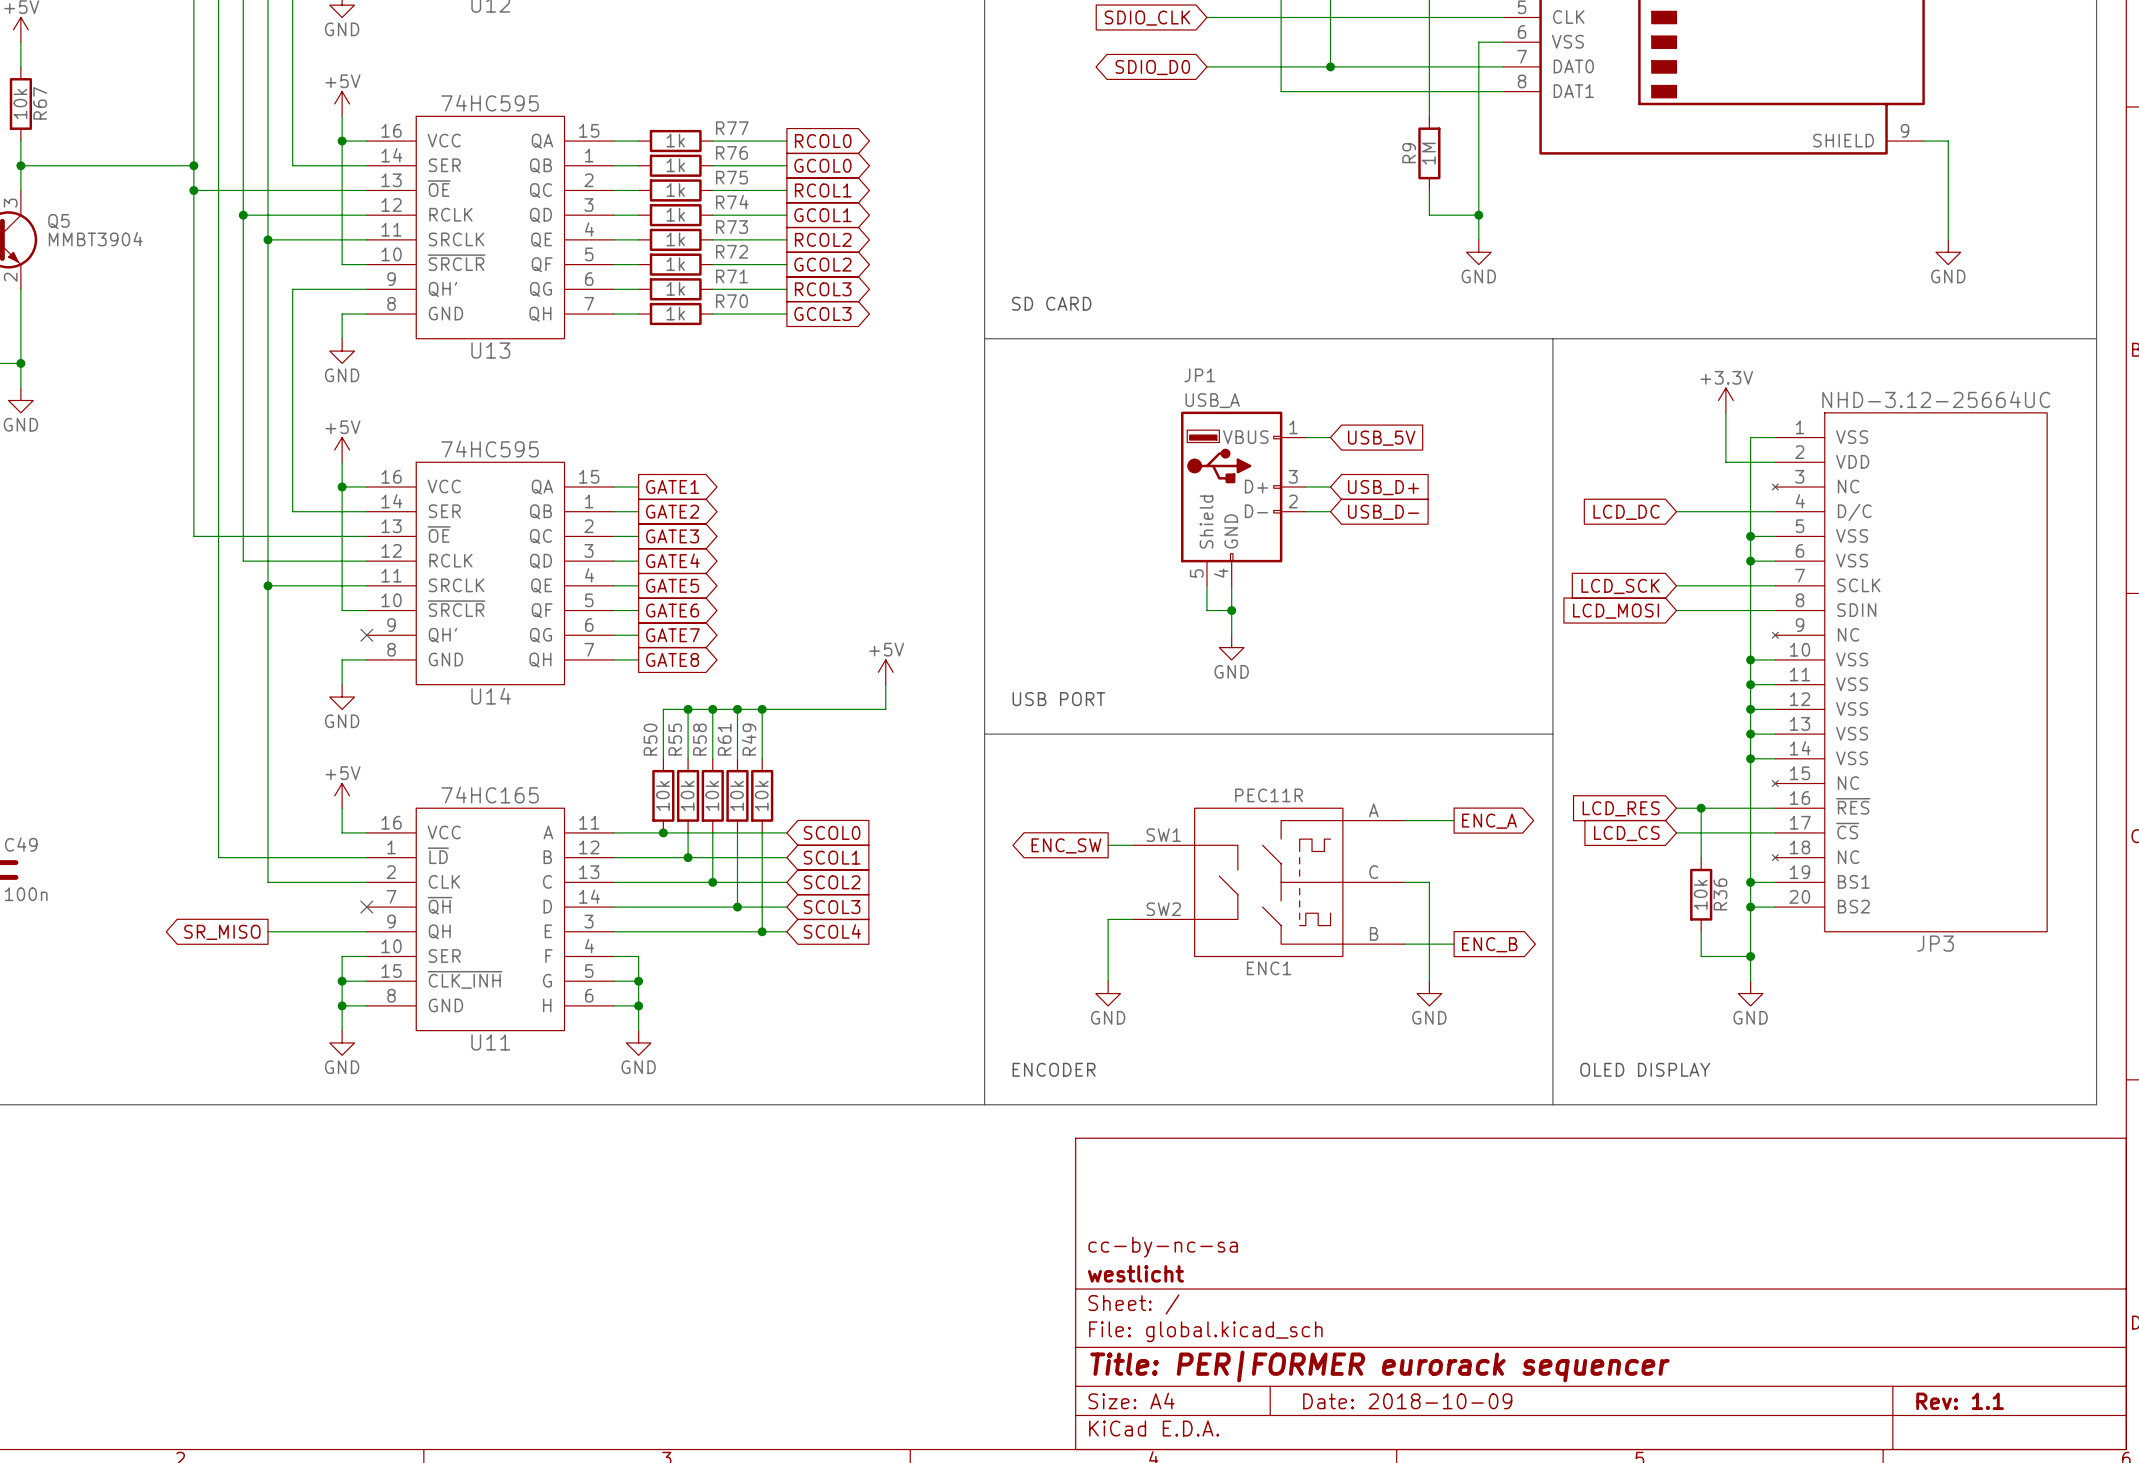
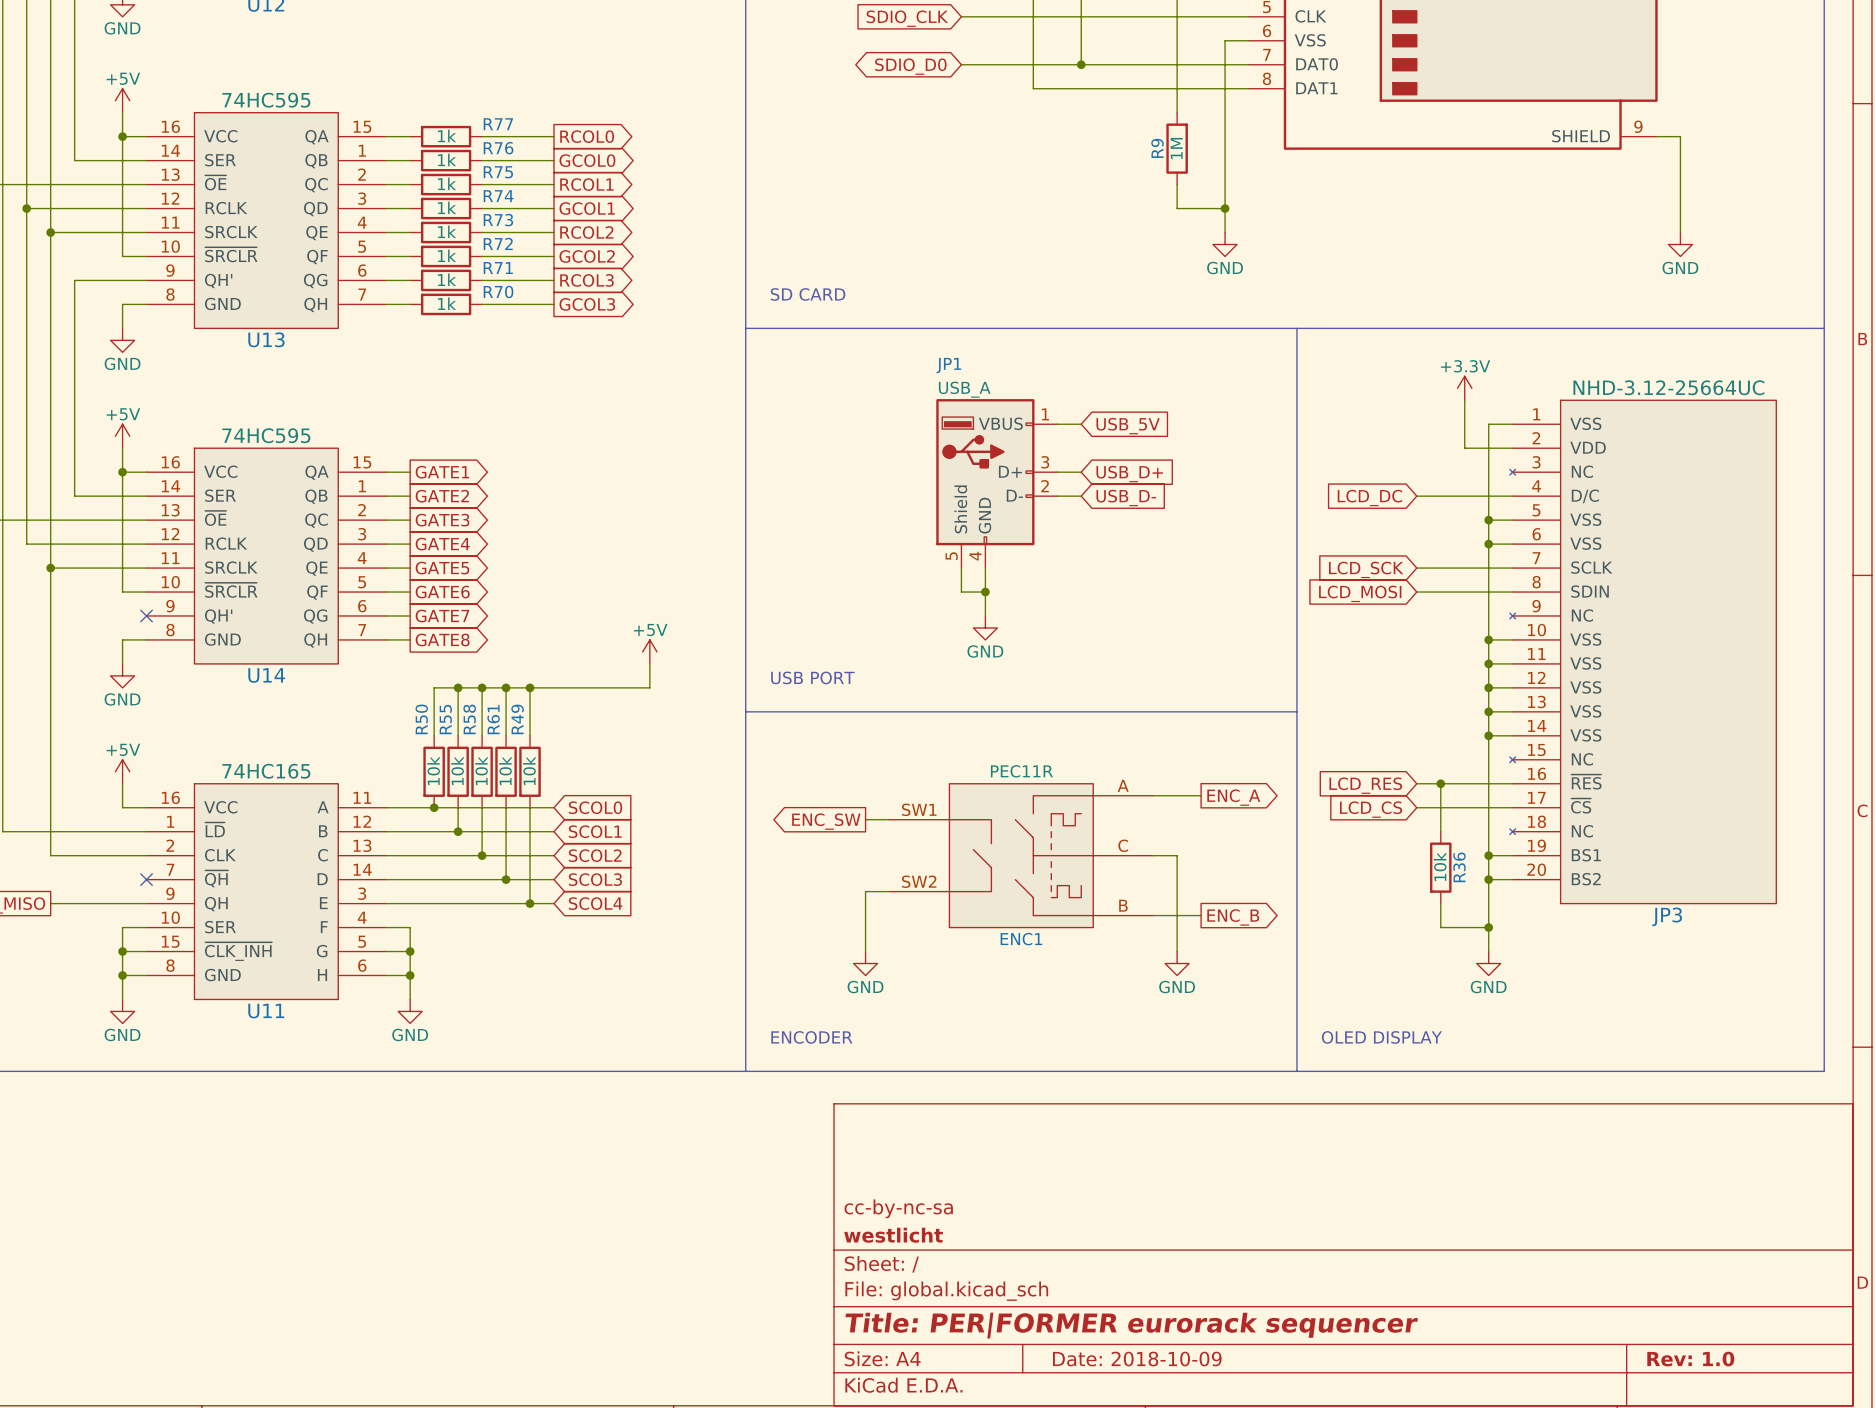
title block: Rev: 1.1 (1960, 1401) -> Rev: 1.0 (1690, 1359)

